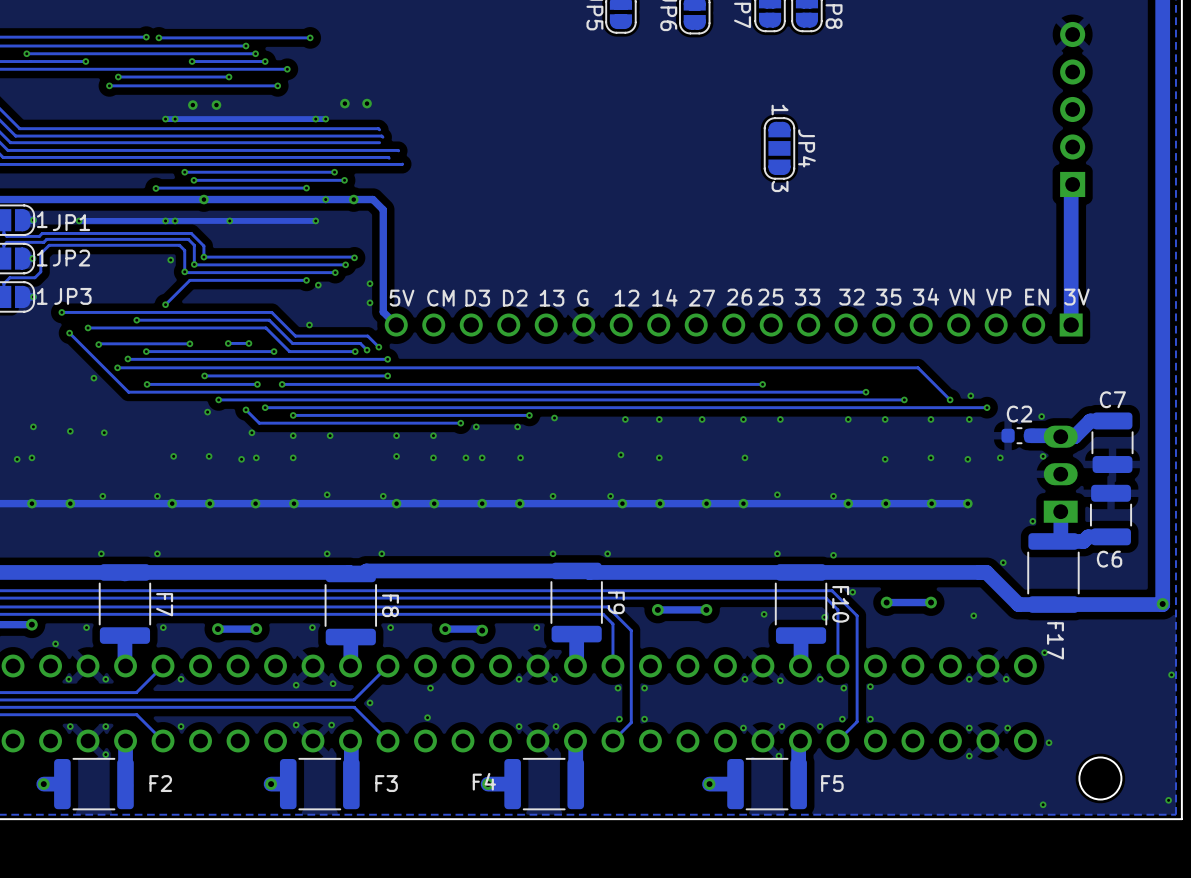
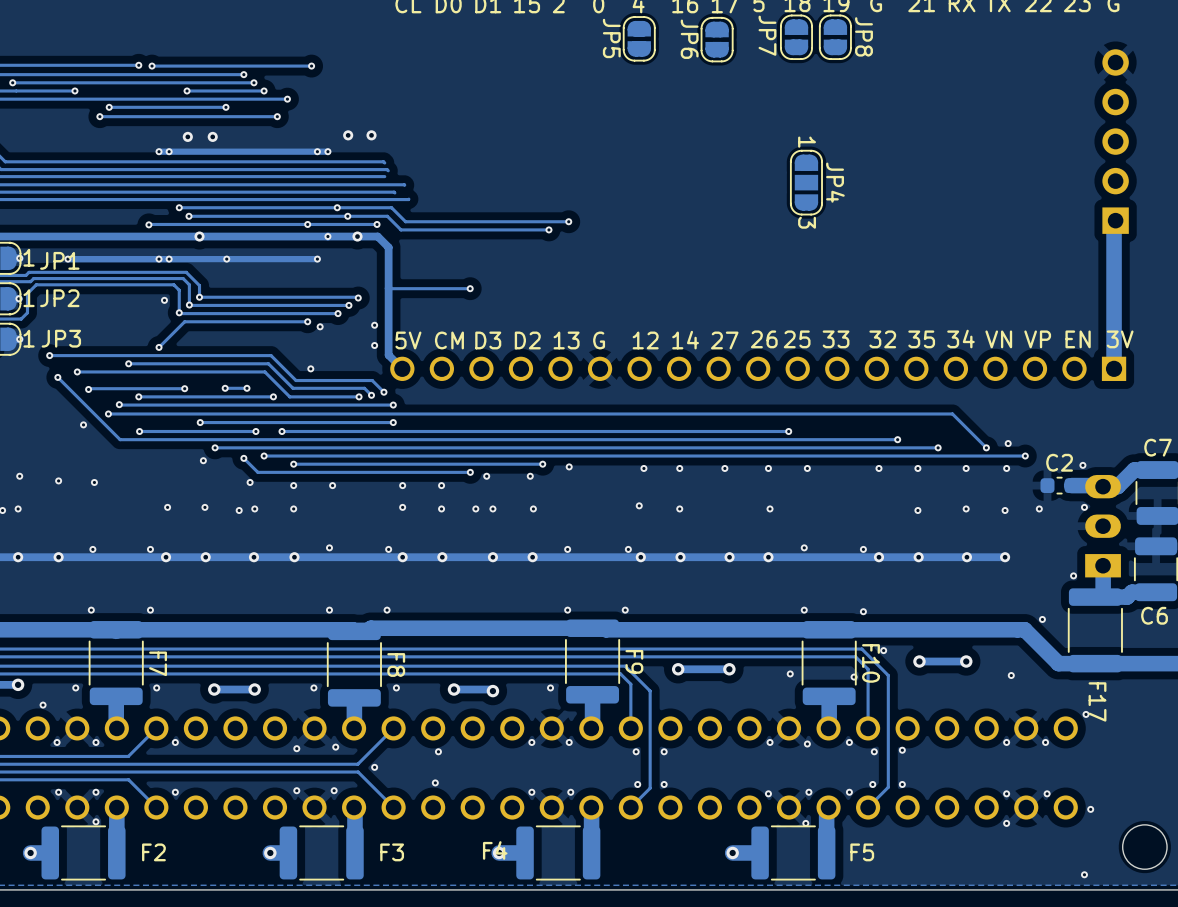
track: none -> (337, 207) (391, 207) (405, 221) (568, 221)
track: none -> (347, 216) (387, 216) (401, 229) (548, 229)
via: none -> (568, 221)
track: none -> (377, 224) (307, 224)
via: none -> (377, 224)
via: none -> (548, 229)
track: none -> (388, 288) (470, 288)
via: none -> (470, 288)

